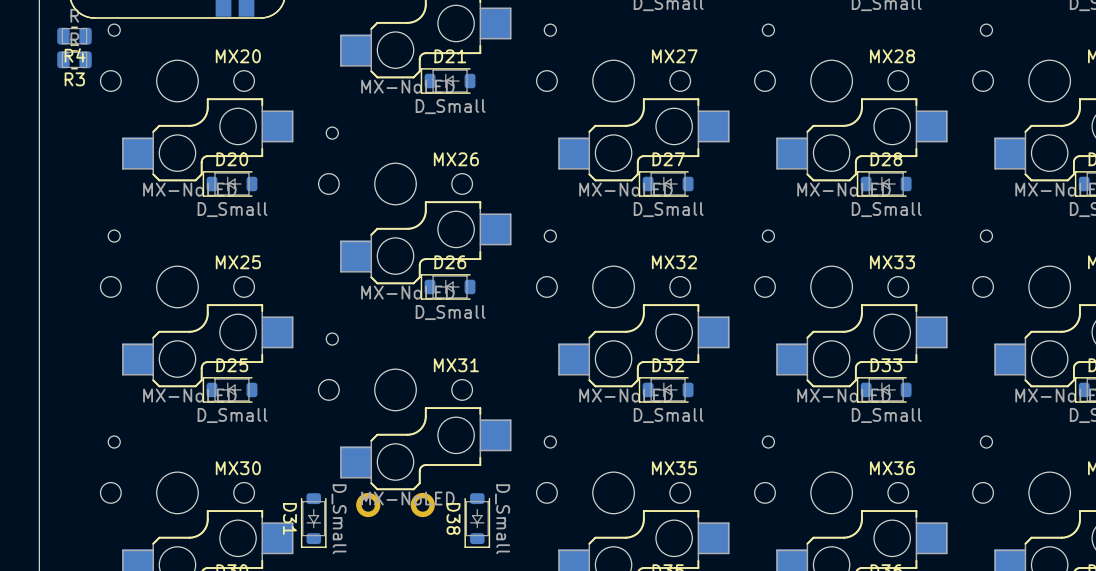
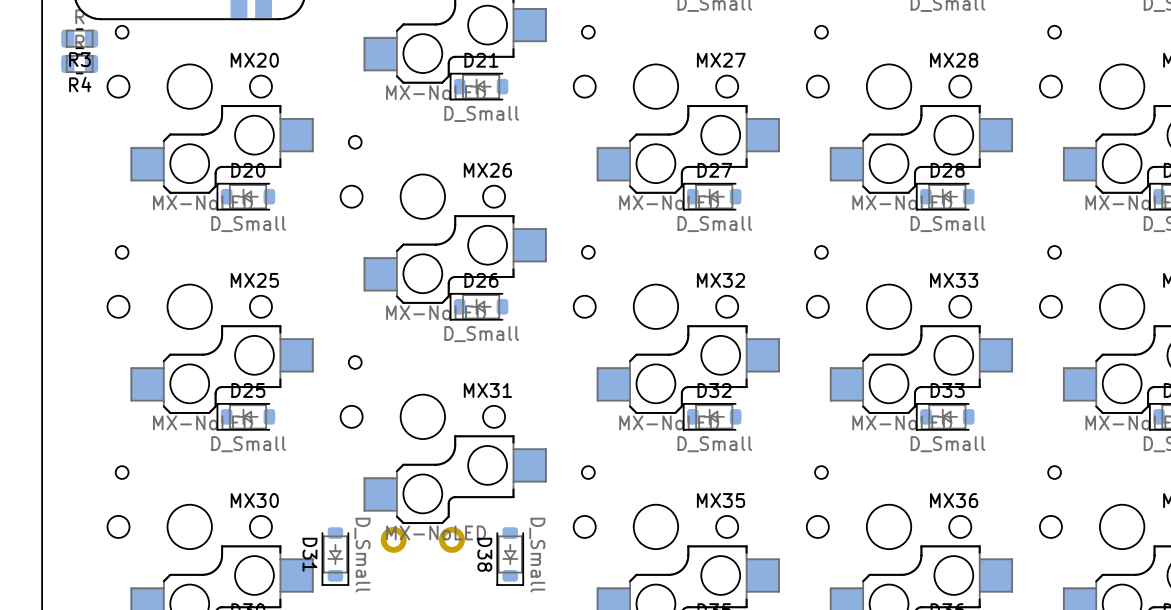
R4 name: R4 (75, 55) -> R3 (79, 59)
R3 name: R3 (74, 79) -> R4 (80, 84)

